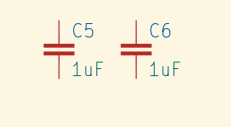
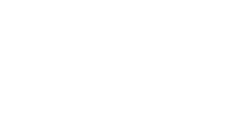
C5: 1uF (59, 49) -> none
C6: 1uF (136, 49) -> none

